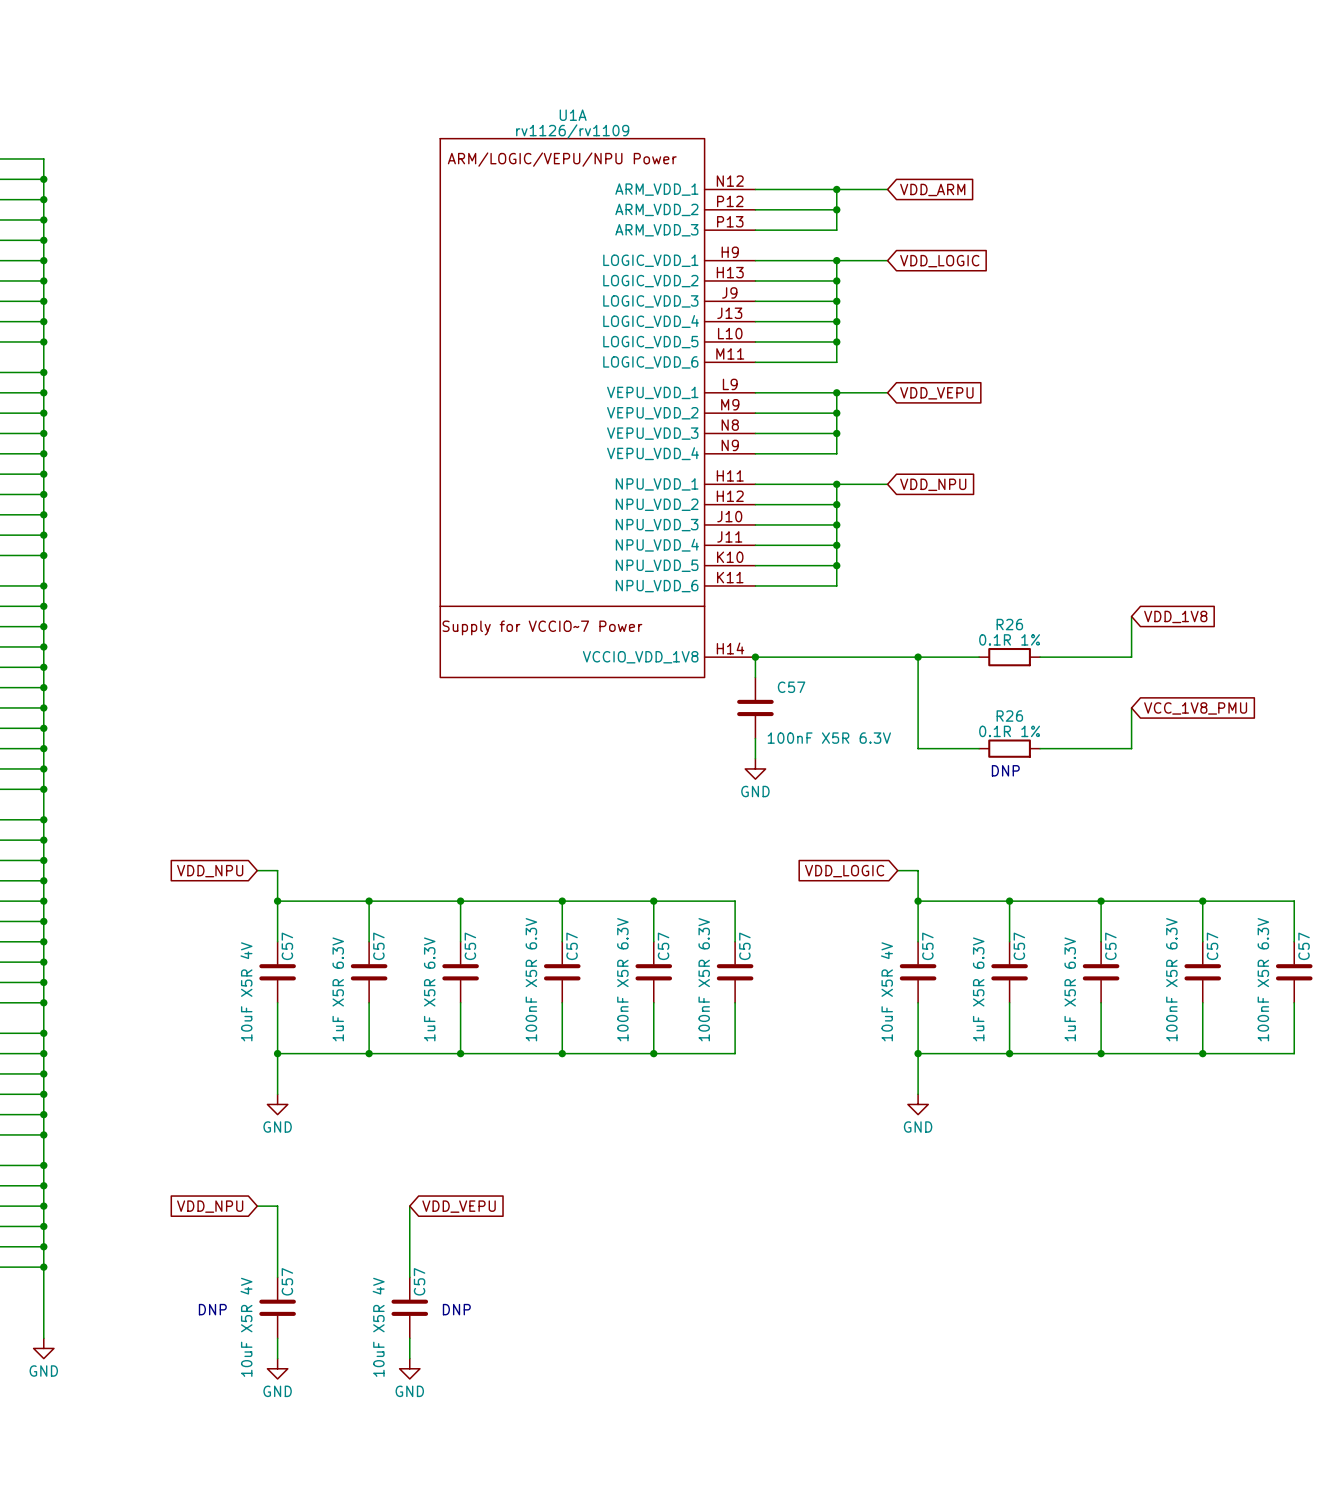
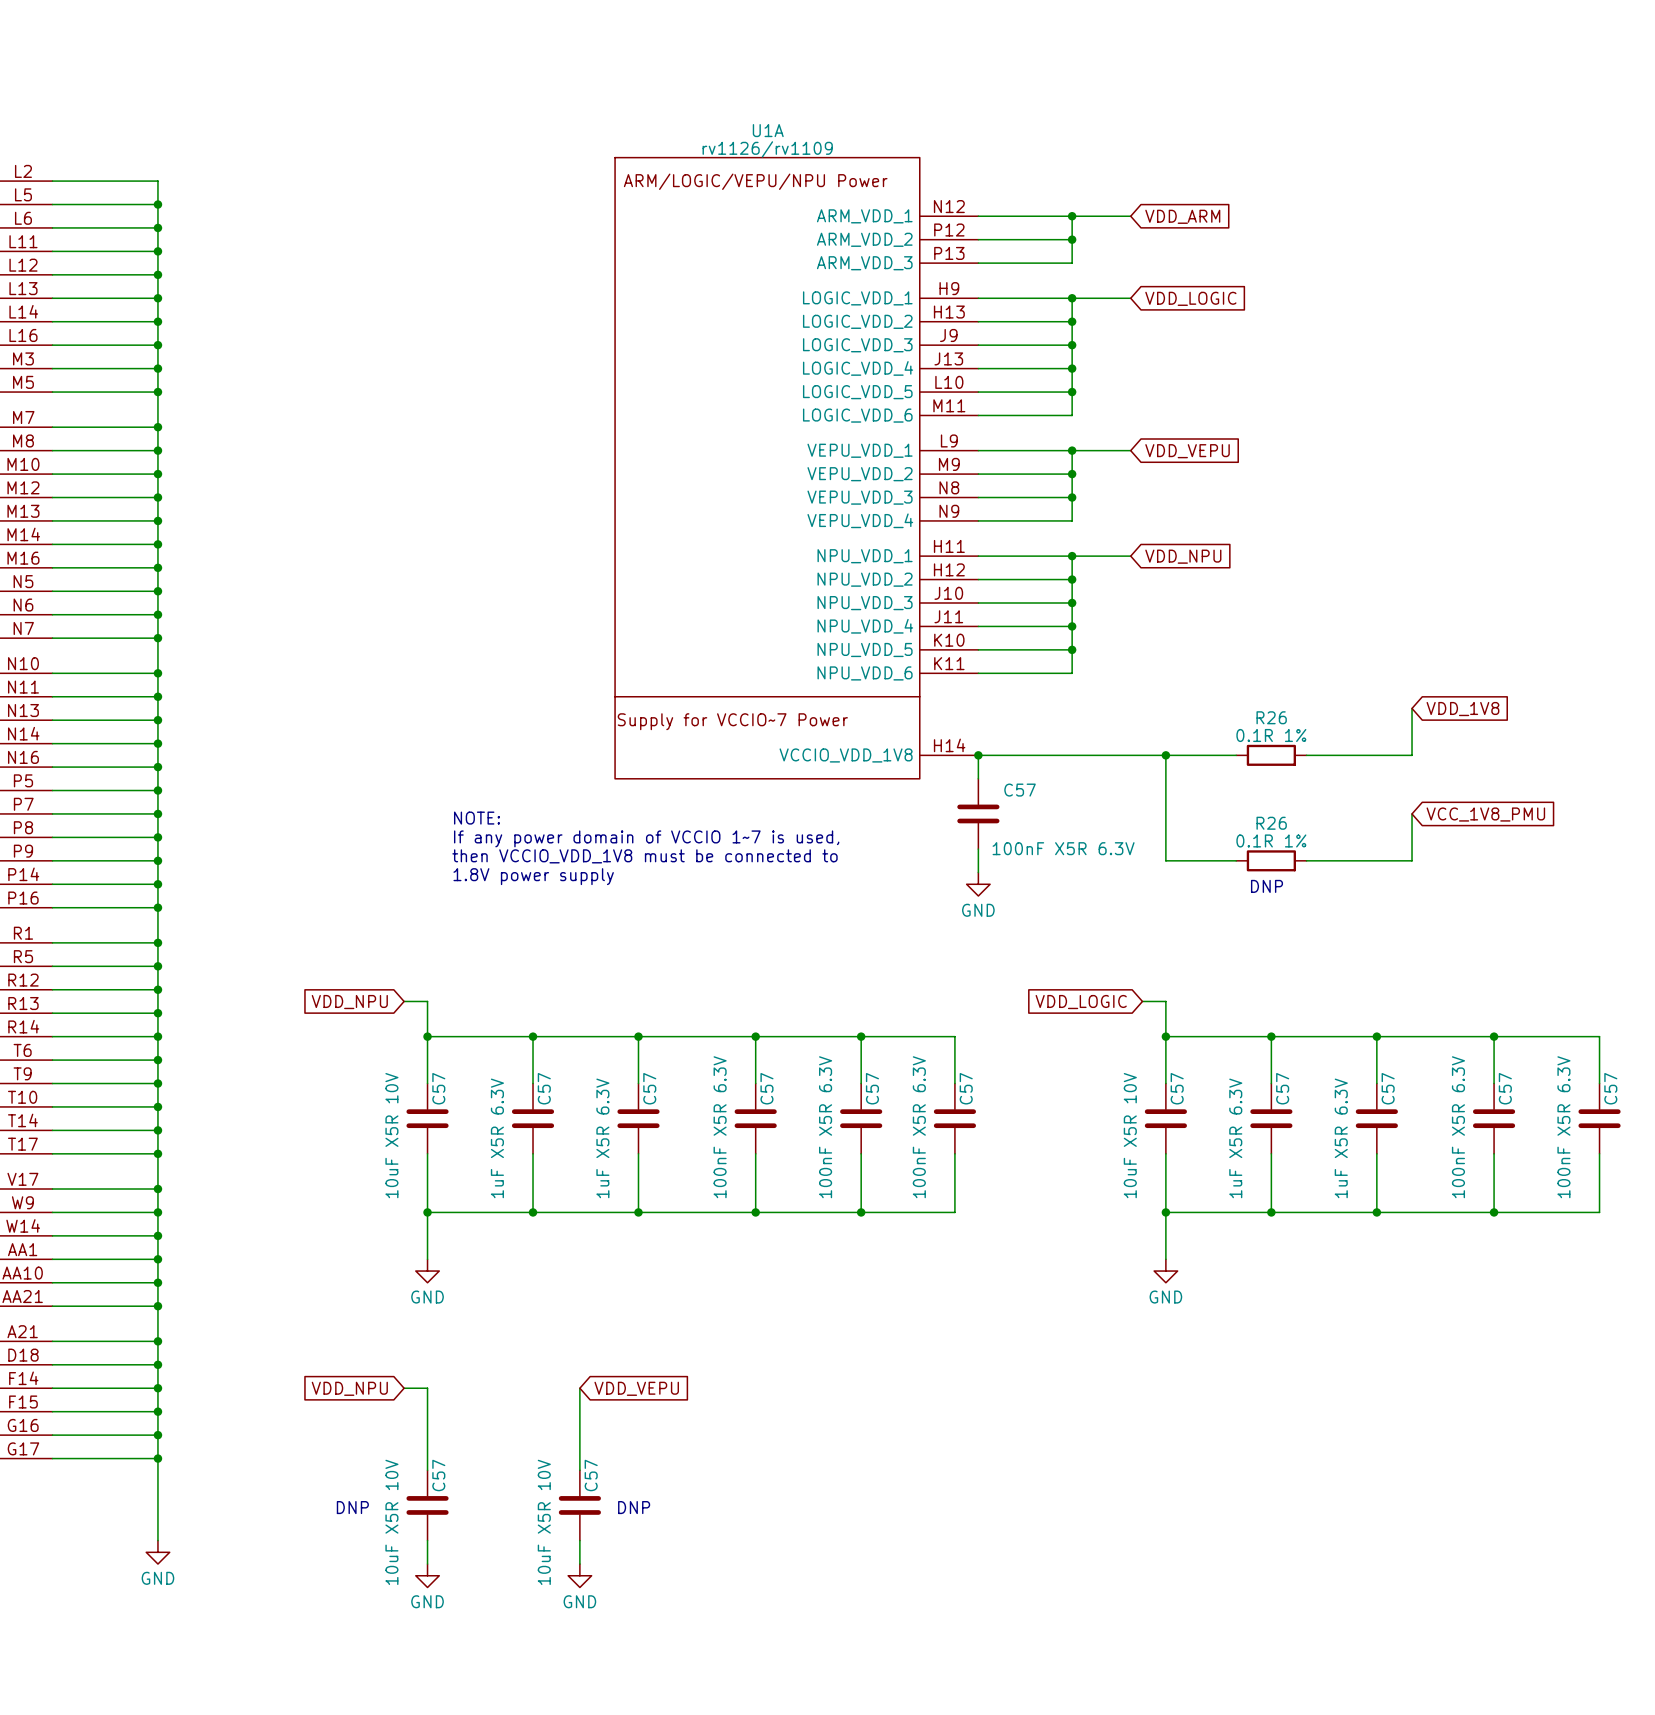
text: none -> NOTE: (477, 818)
text: none -> If any power domain of VCCIO 1~7 is used, (646, 838)
text: none -> then VCCIO_VDD_1V8 must be connected to (644, 856)
text: none -> 1.8V power supply (533, 876)
C57 value: 10uF X5R 4V (246, 991) -> 10uF X5R 10V (391, 1135)
C57 value: 10uF X5R 4V (886, 991) -> 10uF X5R 10V (1130, 1135)
C57 value: 10uF X5R 4V (246, 1327) -> 10uF X5R 10V (391, 1522)
C57 value: 10uF X5R 4V (378, 1327) -> 10uF X5R 10V (544, 1522)

